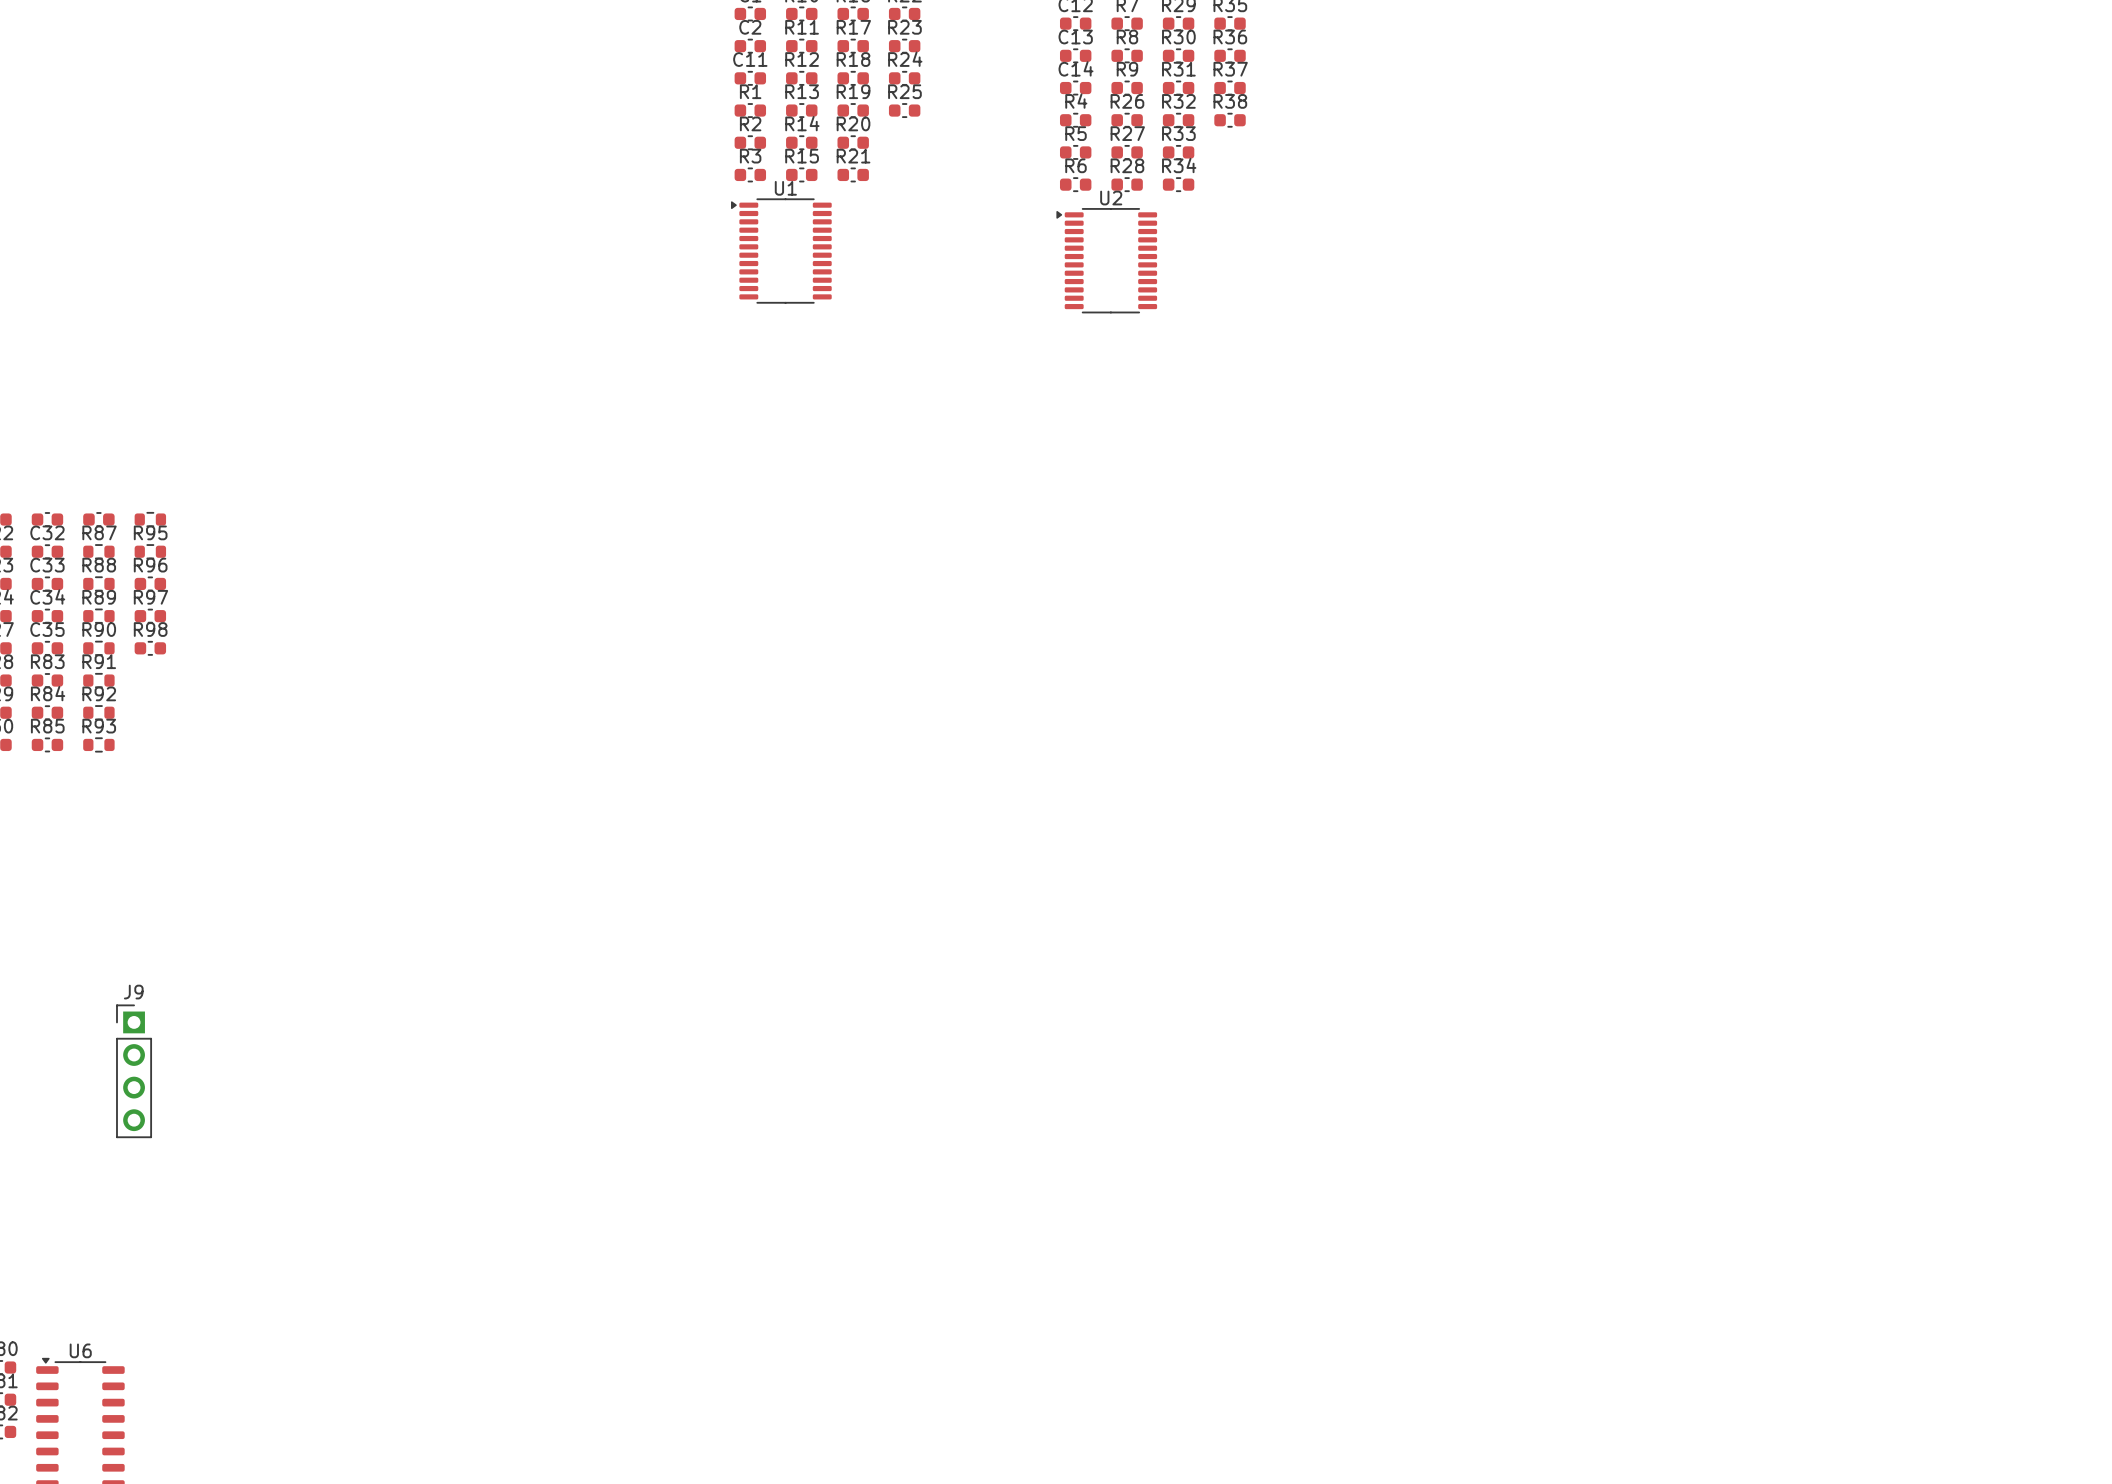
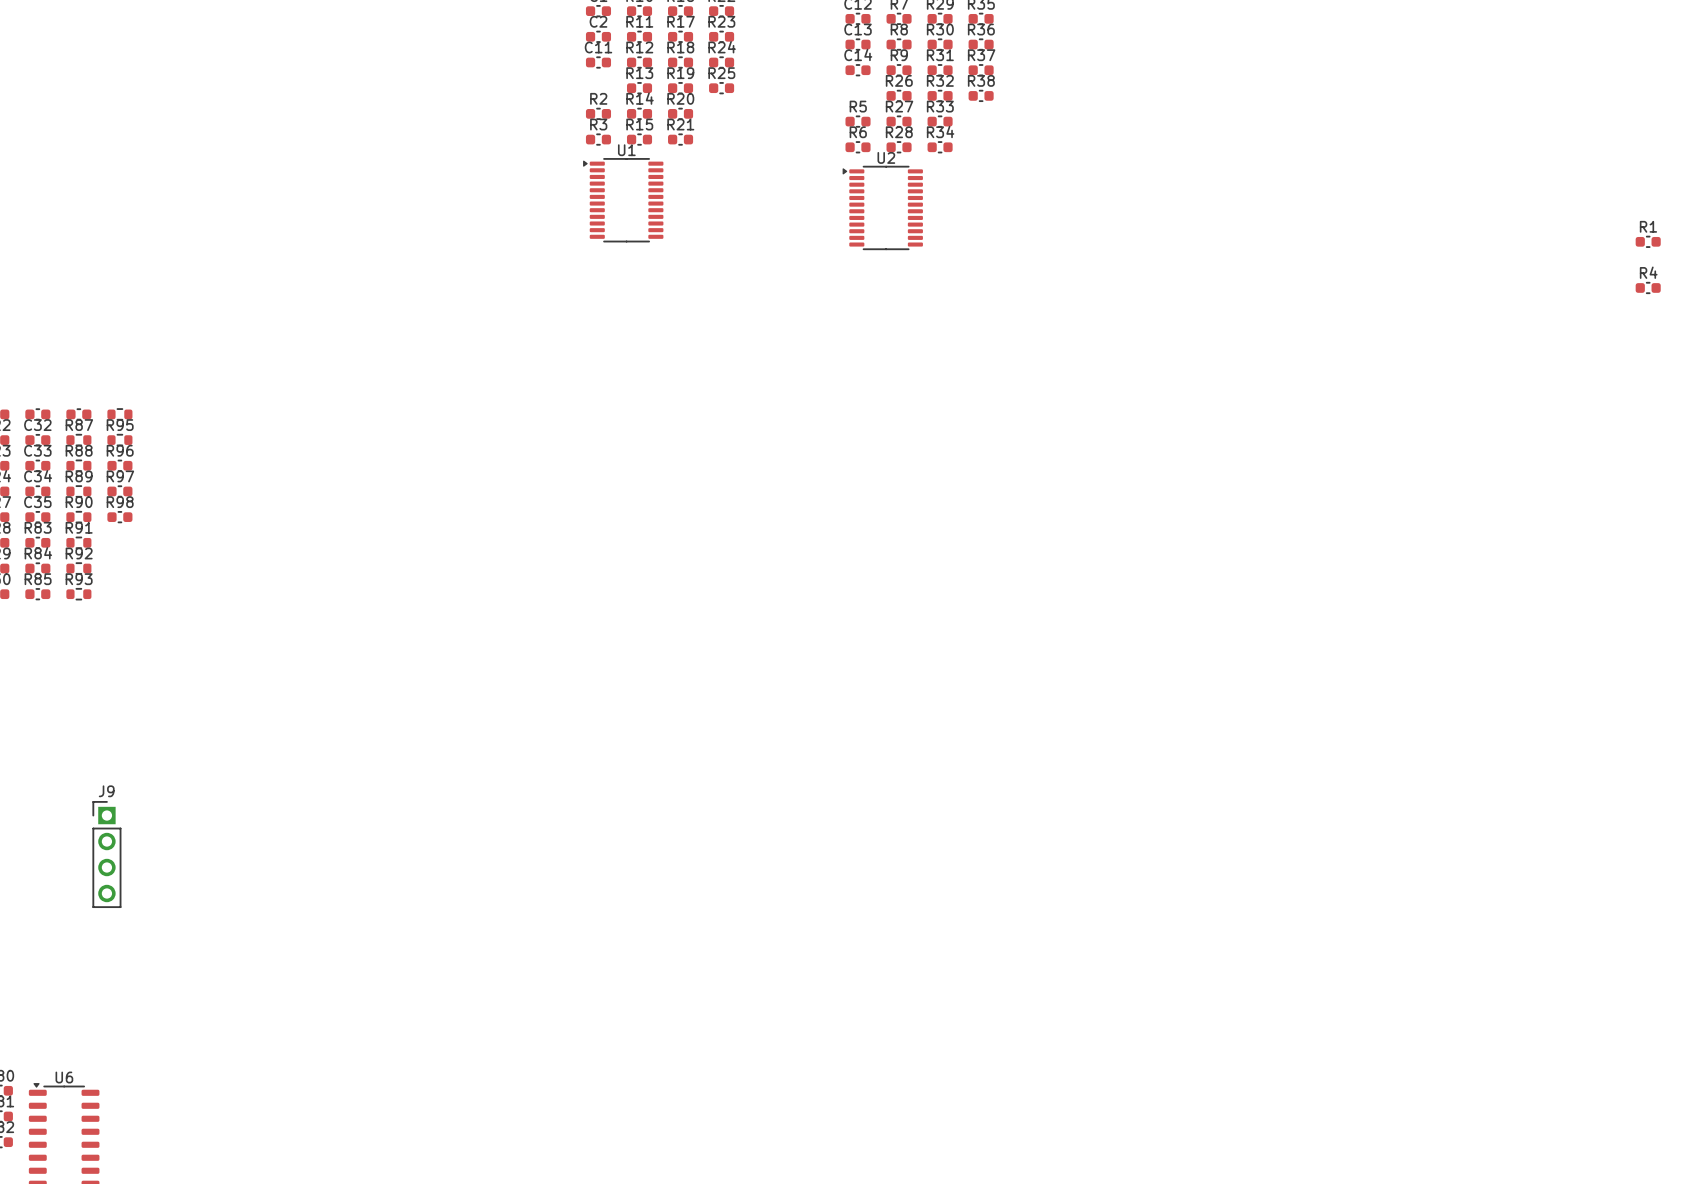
R1 position: (750, 110) -> (1648, 241)
R4 position: (1075, 120) -> (1648, 287)

